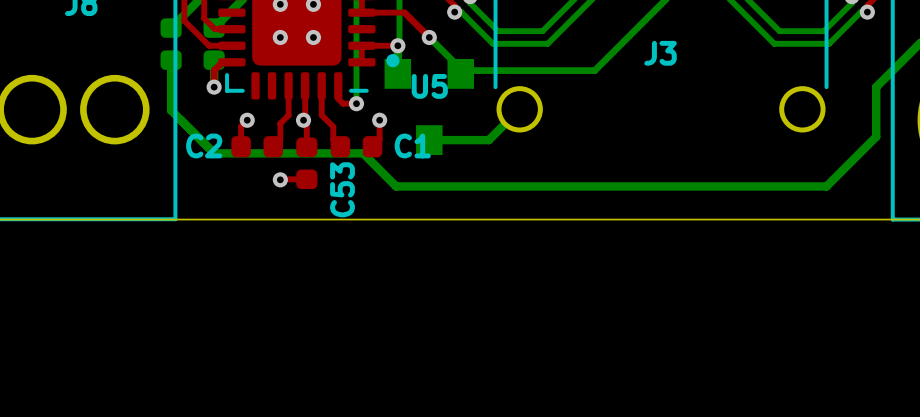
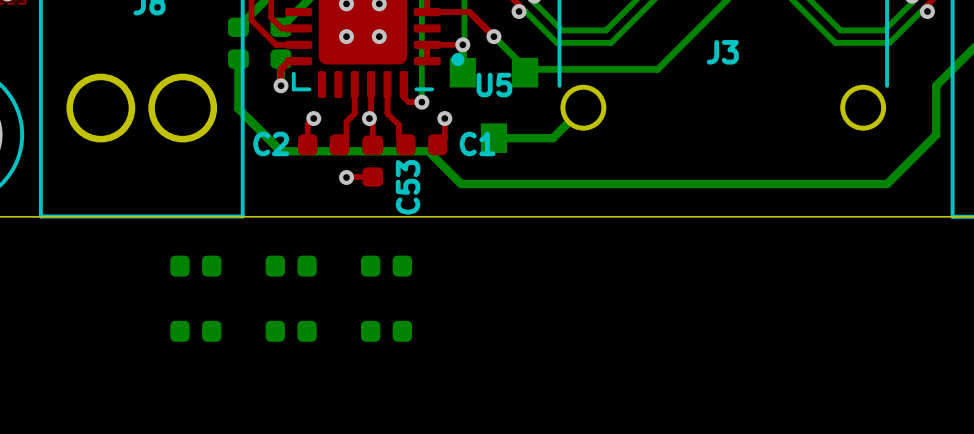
part: none -> (195, 266)
part: none -> (291, 266)
part: none -> (386, 266)
part: none -> (195, 331)
part: none -> (291, 331)
part: none -> (386, 331)

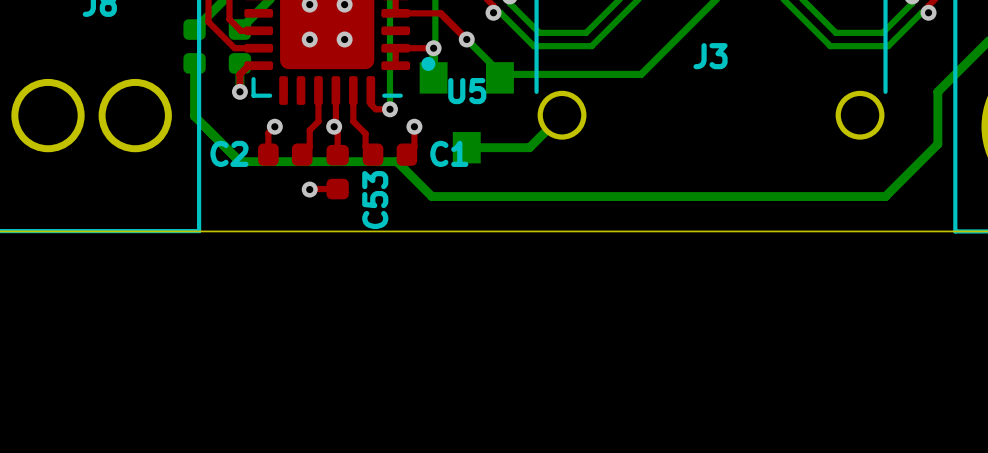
part: (195, 266) -> none
part: (291, 266) -> none
part: (386, 266) -> none
part: (195, 331) -> none
part: (291, 331) -> none
part: (386, 331) -> none

